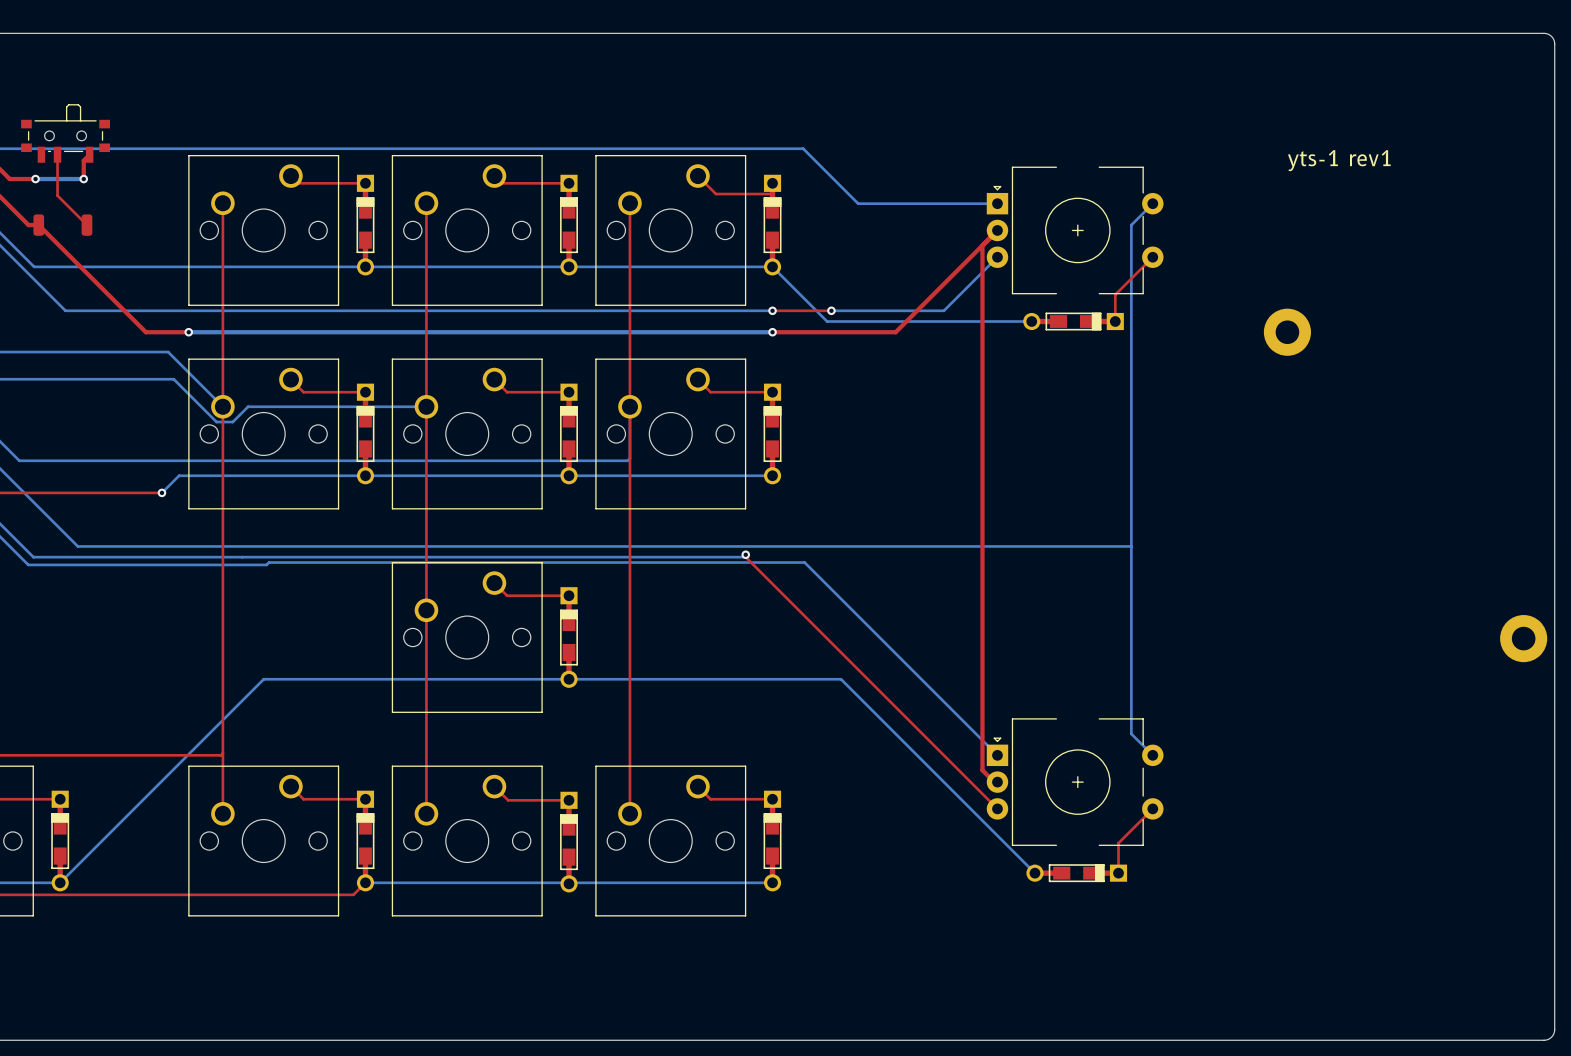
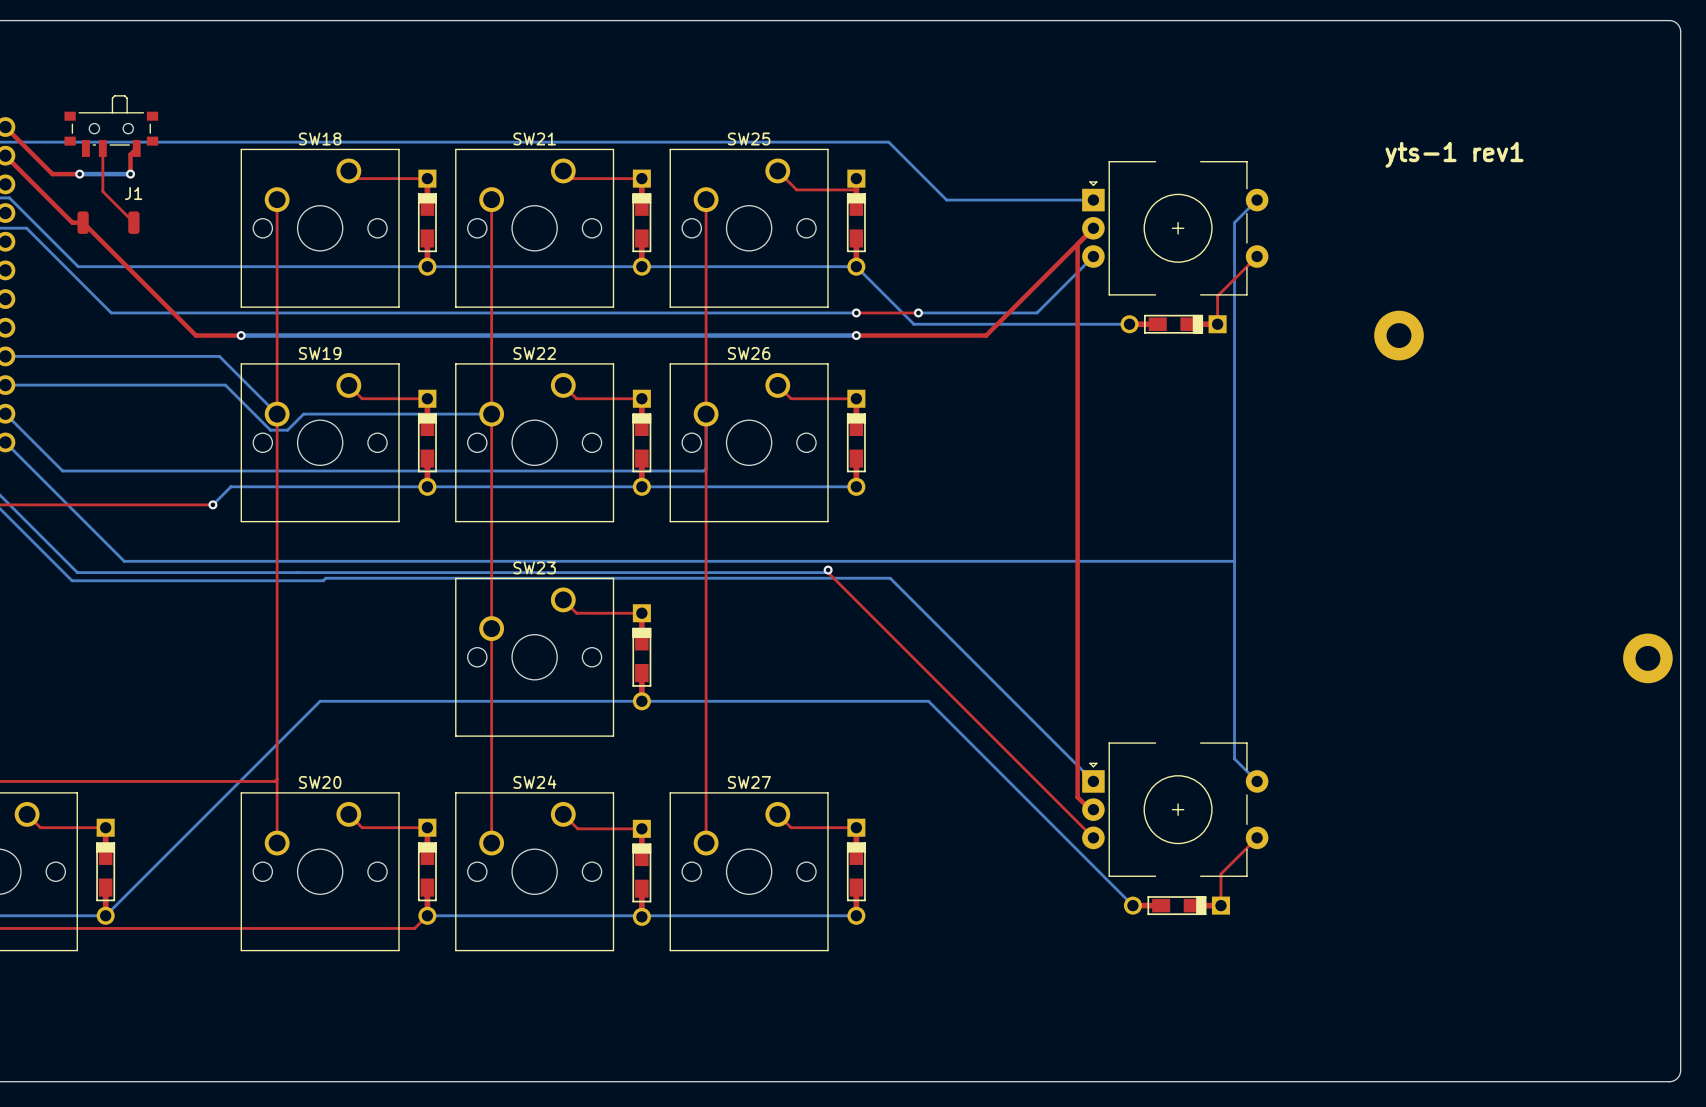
SW18 name: none -> SW18 (320, 138)
SW21 name: none -> SW21 (534, 138)
SW25 name: none -> SW25 (749, 138)
J1 name: none -> J1 (133, 193)
SW19 name: none -> SW19 (320, 353)
SW22 name: none -> SW22 (534, 353)
SW26 name: none -> SW26 (749, 353)
SW23 name: none -> SW23 (534, 567)
SW20 name: none -> SW20 (320, 782)
SW24 name: none -> SW24 (534, 782)
SW27 name: none -> SW27 (749, 782)

